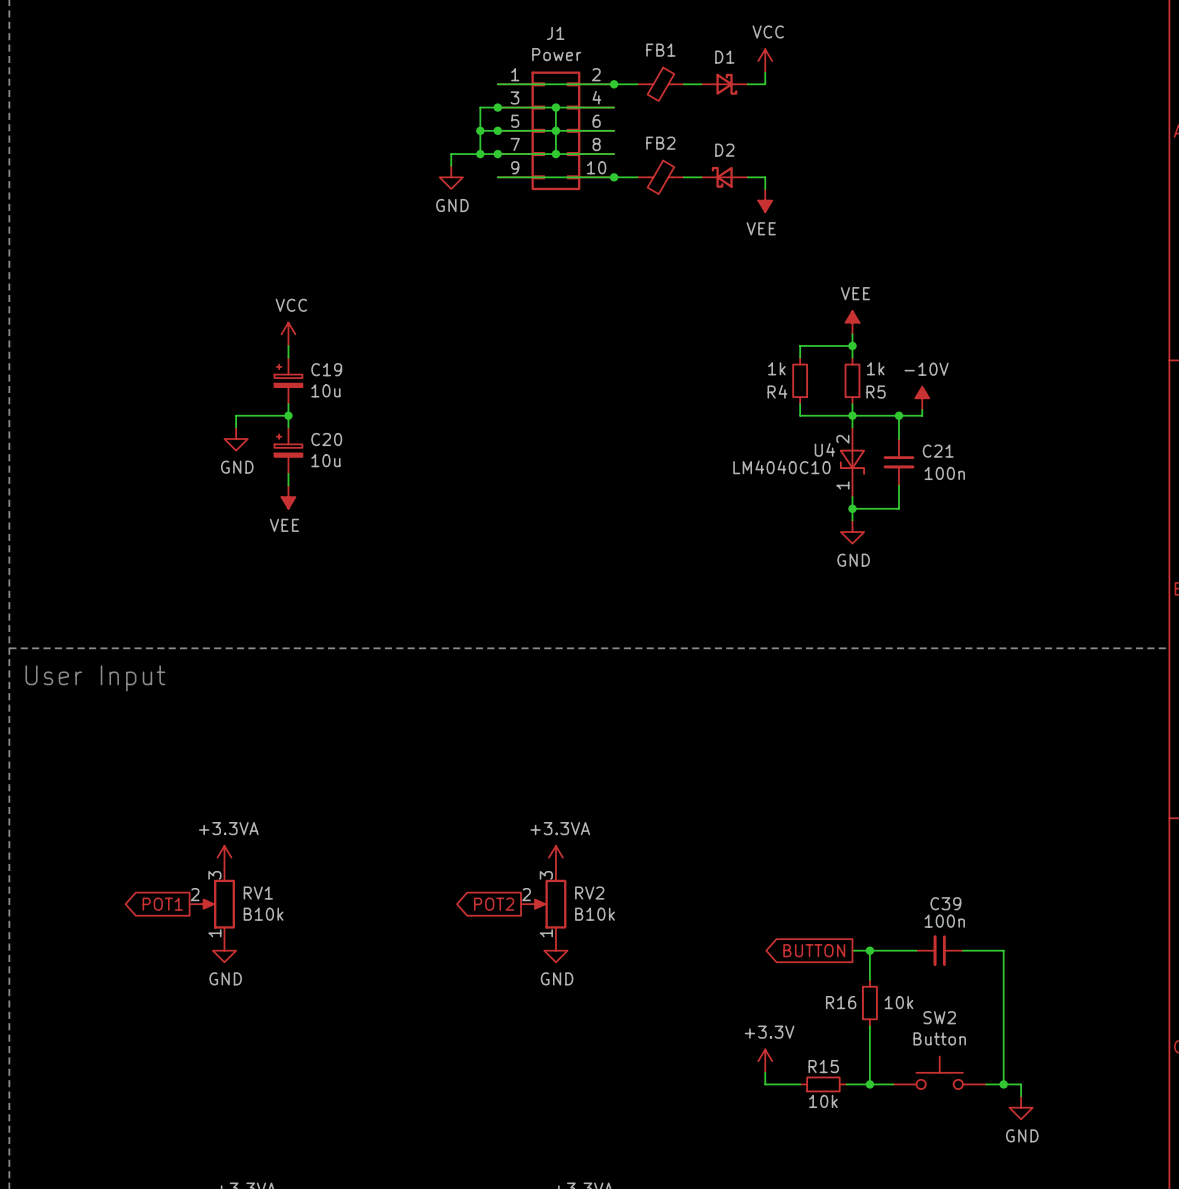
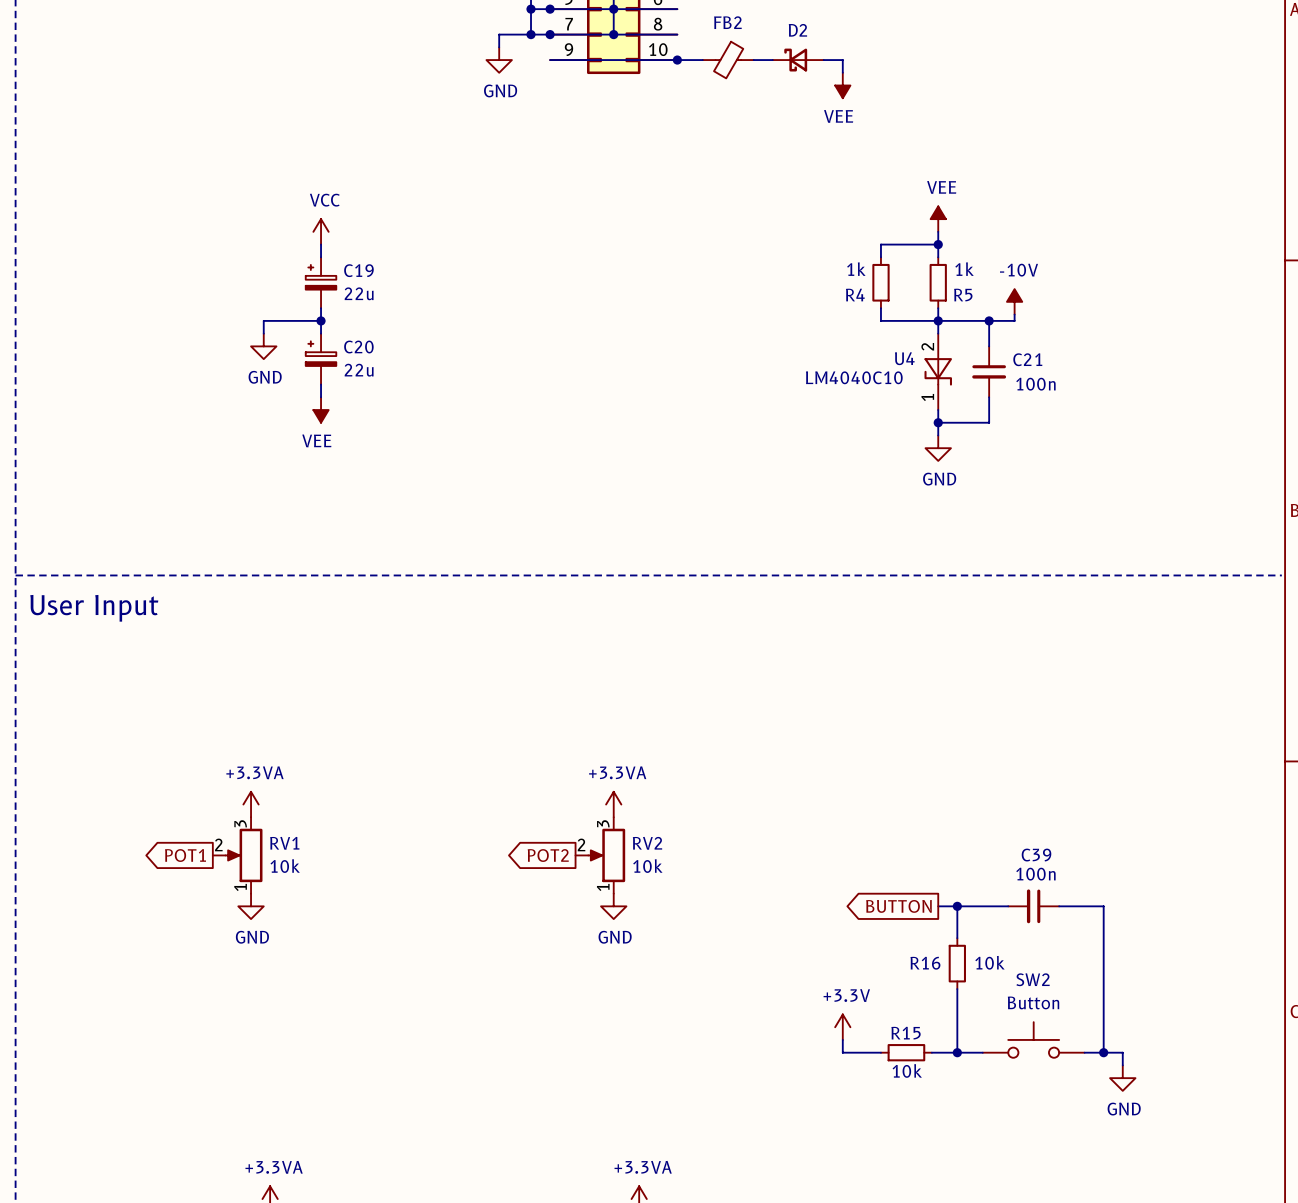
C19 value: 10u (325, 390) -> 22u (359, 293)
C20 value: 10u (325, 460) -> 22u (359, 370)
RV1 value: B10k (263, 914) -> 10k (285, 866)
RV2 value: B10k (595, 914) -> 10k (647, 866)

